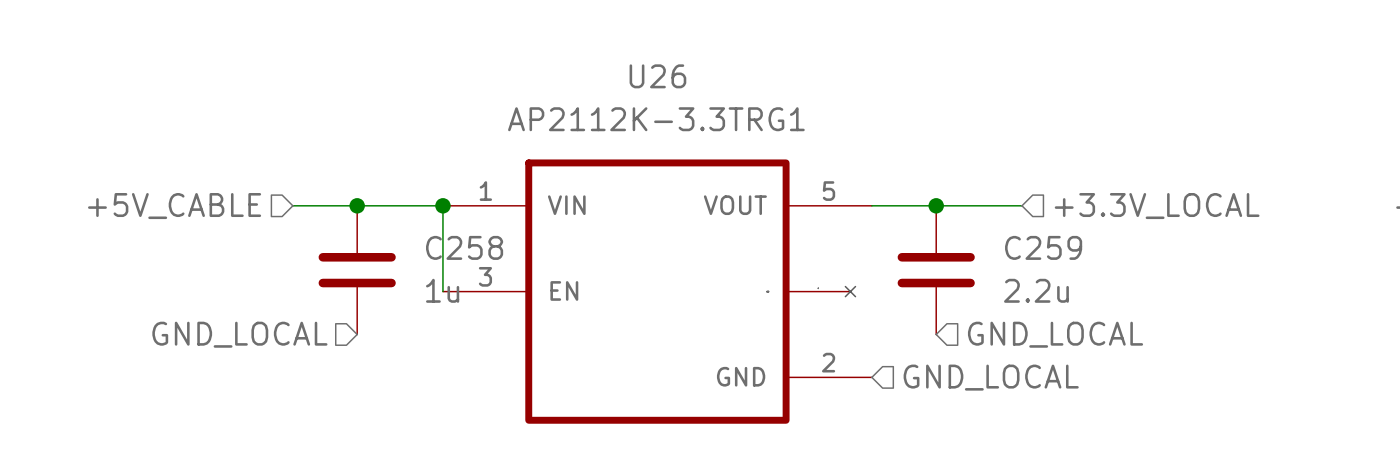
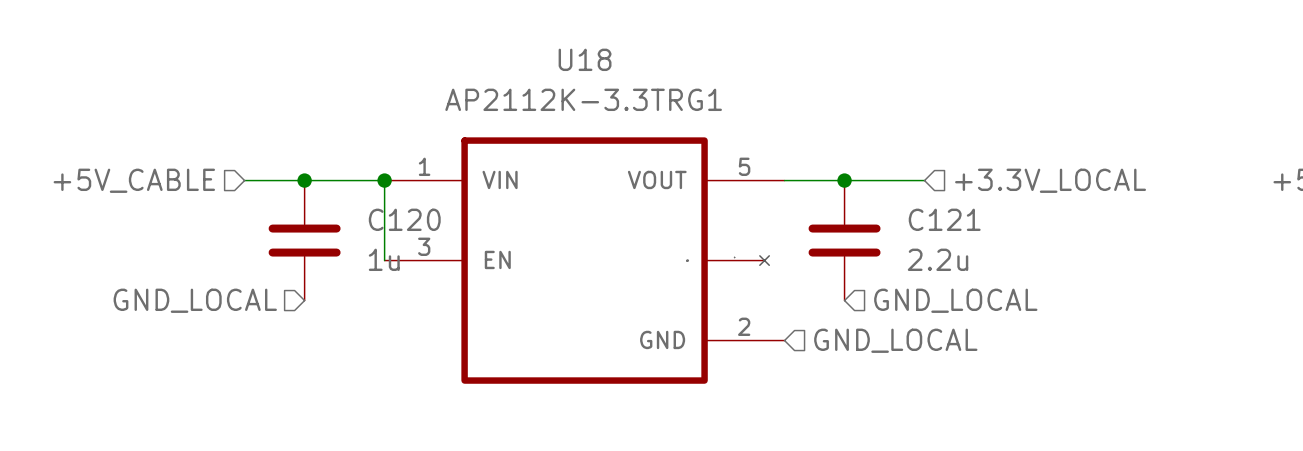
U26 name: U26 (657, 76) -> U18 (585, 59)
C258 name: C258 (464, 247) -> C120 (404, 219)
C259 name: C259 (1043, 247) -> C121 (944, 219)

